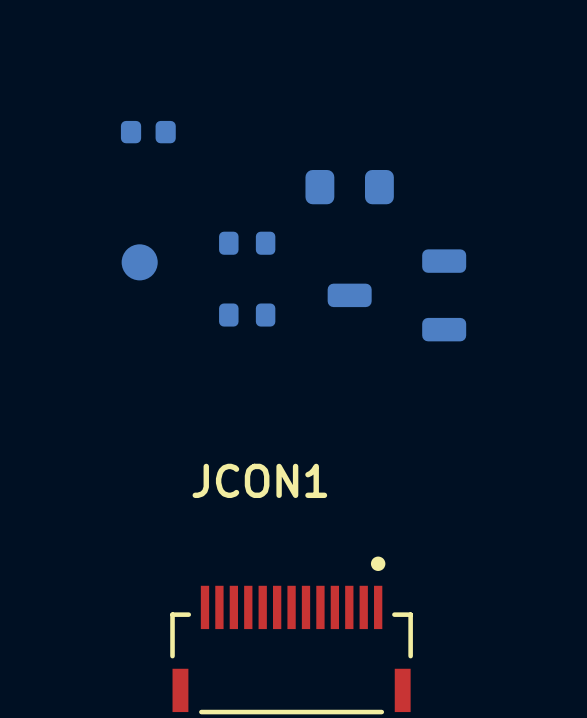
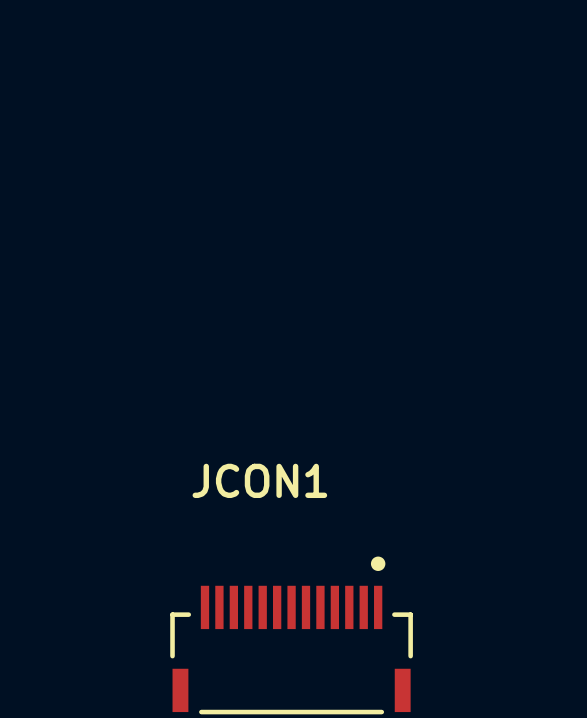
part: (148, 132) -> none
part: (349, 187) -> none
part: (247, 243) -> none
part: (139, 262) -> none
part: (396, 295) -> none
part: (247, 315) -> none

